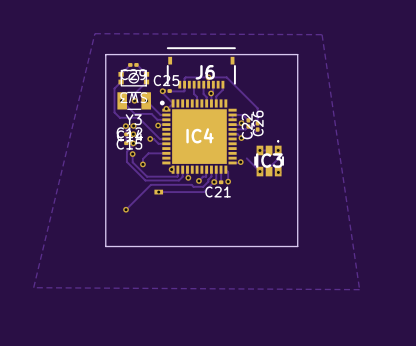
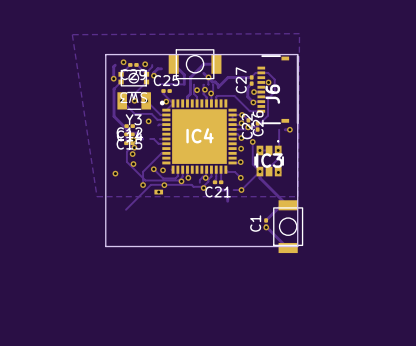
zone outline: (94, 33) (322, 34) (359, 289) (33, 287) (94, 33) -> none
zone outline: none -> (299, 33) (72, 34) (97, 196) (298, 196) (299, 33)
via: none -> (123, 62)
via: none -> (145, 64)
track: none -> (173, 64) (184, 74) (184, 84) (159, 84)
part: none -> (195, 64)
track: none -> (216, 64) (203, 64) (190, 77) (190, 93) (187, 96) (187, 103)
track: none -> (115, 65) (113, 78)
track: none -> (152, 65) (146, 74)
J6 rotation: 0° (201, 67) -> 90° clockwise (278, 89)
J6 position: (201, 67) -> (278, 89)
track: none -> (161, 68) (157, 68) (153, 72) (153, 75)
track: none -> (203, 73) (212, 81) (215, 81) (218, 87) (228, 77) (251, 77)
via: none -> (153, 75)
track: none -> (251, 76) (255, 72) (268, 72) (274, 79) (274, 92) (269, 96) (261, 96)
via: none -> (113, 78)
C27: none -> (251, 80)
via: none -> (268, 82)
track: none -> (251, 83) (247, 87) (247, 96) (253, 102) (261, 101)
track: (222, 84) (222, 89) (216, 96) -> (261, 111) (249, 111) (234, 95) (216, 96)
track: (114, 88) (114, 112) (119, 117) (138, 117) (159, 138) -> (114, 88) (114, 116) (130, 133) (136, 133) (142, 138)
via: none -> (204, 89)
via: none -> (197, 90)
via: (162, 91) -> none
track: (169, 91) (184, 91) (185, 77) (226, 77) (257, 108) (257, 123) (248, 126) -> none
via: none -> (254, 92)
track: none -> (267, 96) (268, 115) (256, 127) (248, 127)
via: none -> (166, 101)
via: none -> (253, 102)
via: (166, 108) -> none
via: none -> (242, 114)
via: none -> (148, 121)
via: (133, 125) -> none
via: (158, 125) -> none
via: (125, 126) -> none
via: none -> (248, 127)
track: none -> (279, 129) (278, 150)
track: none -> (285, 129) (289, 129)
via: none -> (289, 129)
via: (133, 134) -> none
via: (150, 138) -> none
via: none -> (133, 140)
via: none -> (252, 141)
via: (133, 143) -> none
via: none -> (134, 147)
via: none -> (241, 148)
track: (161, 153) (148, 153) (142, 158) (142, 164) -> (161, 153) (143, 171) (143, 185)
track: (132, 154) (132, 162) (147, 176) (177, 176) -> (153, 169) (163, 178) (175, 178) (177, 176)
track: (246, 158) (252, 164) -> (252, 141) (252, 164)
via: none -> (133, 164)
via: (142, 164) -> none
via: none -> (153, 169)
via: (171, 169) -> none
via: none -> (163, 170)
track: (228, 171) (228, 181) -> (228, 171) (234, 171) (240, 177)
via: none -> (115, 173)
via: none -> (205, 177)
via: none -> (240, 177)
via: (198, 180) -> none
via: none -> (181, 181)
via: (228, 181) -> none
track: (214, 182) (204, 192) (158, 192) -> none
via: (214, 182) -> none
via: none -> (143, 185)
via: none -> (164, 185)
via: none -> (203, 188)
track: none -> (218, 190) (227, 190) (227, 201)
track: none -> (233, 190) (241, 190) (259, 171) (259, 178) (287, 205) (281, 205) (266, 220)
via: none -> (241, 190)
via: (126, 209) -> none
C1: none -> (266, 223)
part: none -> (288, 226)
track: none -> (266, 227) (287, 248)
via: none -> (266, 227)

